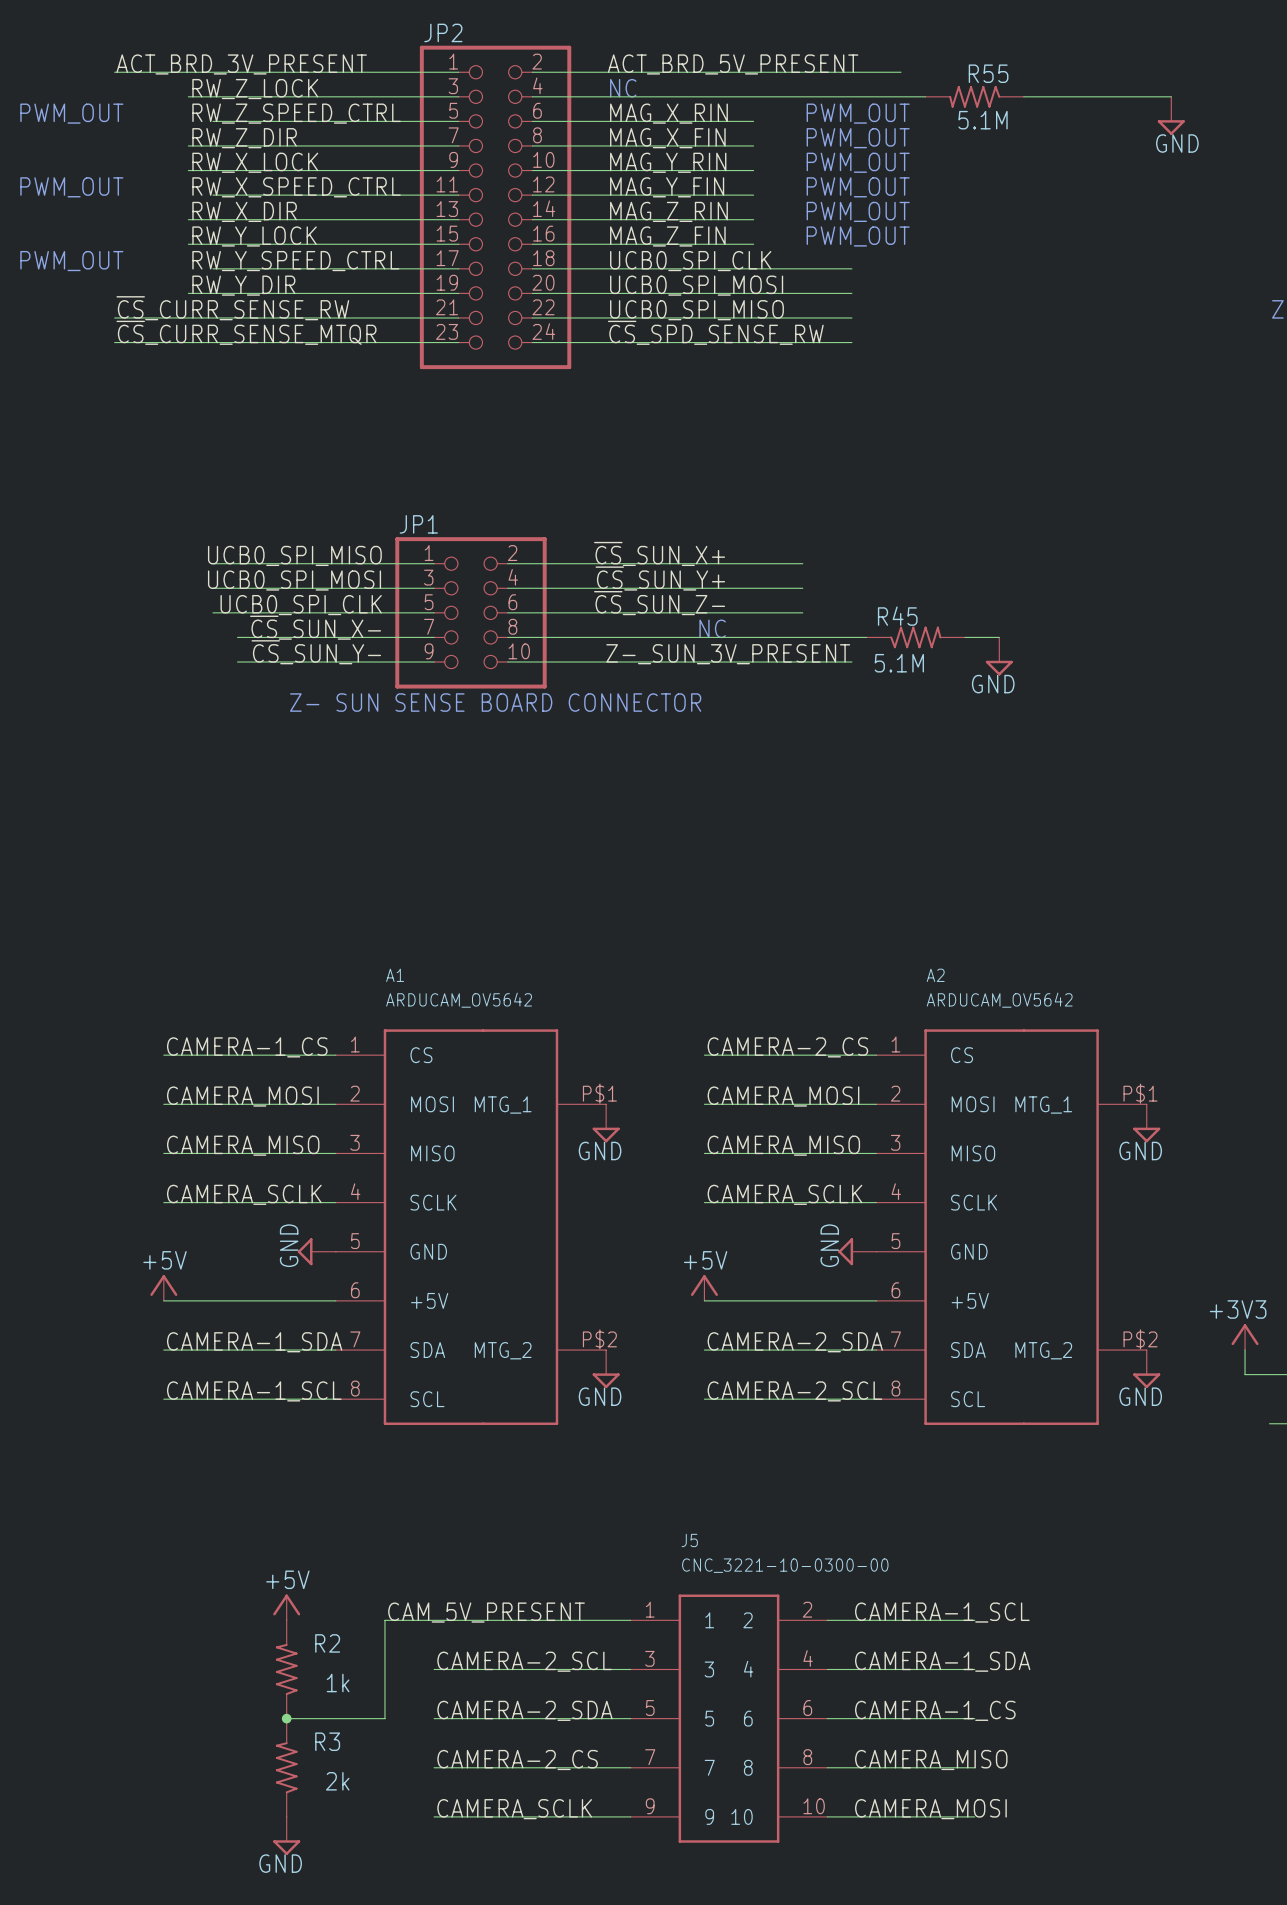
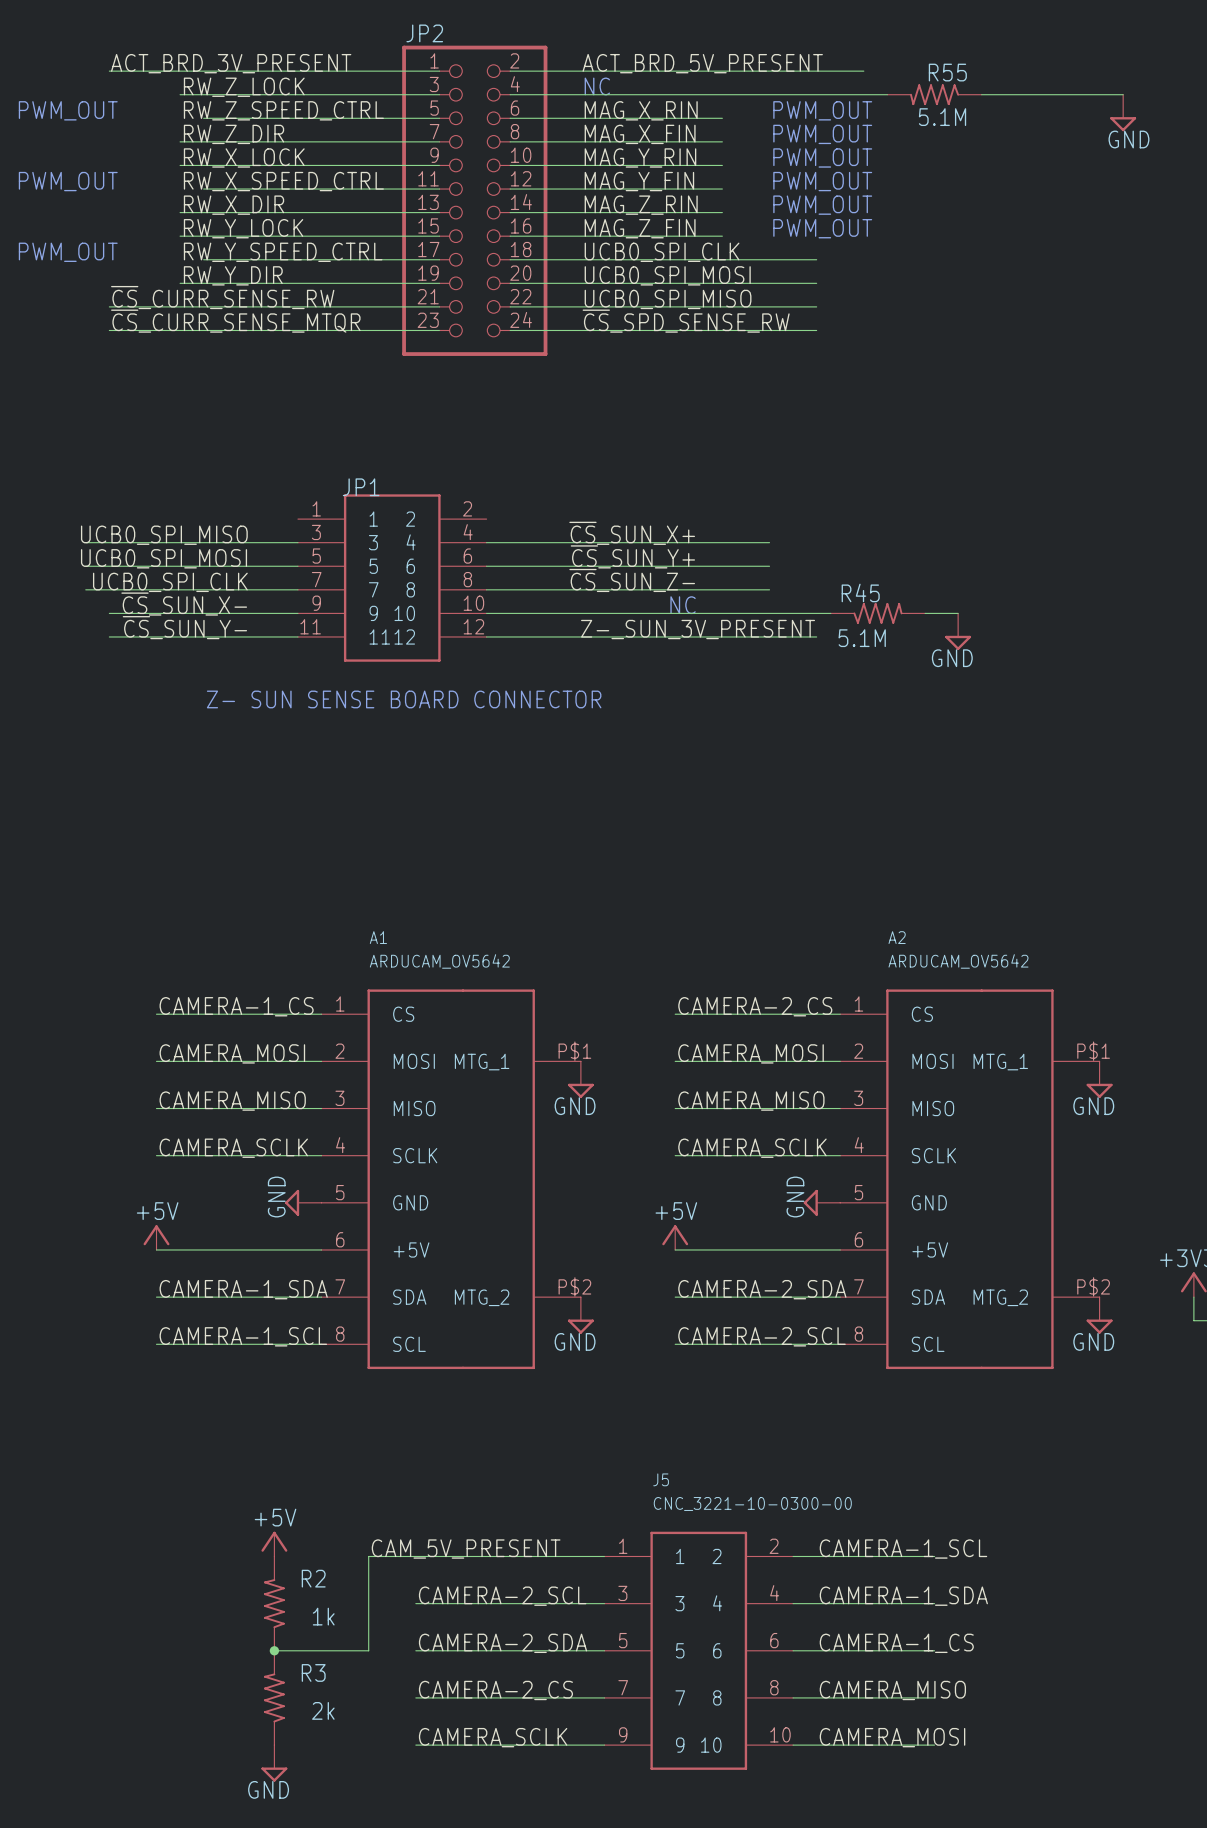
JP1 name position: JP1 (418, 524) -> JP1 (361, 487)
JP1 symbol: [395, 537, 547, 689] -> [297, 494, 487, 662]
label position: UCB0_SPI_MISO (294, 555) -> UCB0_SPI_MISO (164, 535)
wire: (311, 563) (434, 563) -> (85, 542) (203, 542)
label position: UCB0_SPI_MOSI (294, 580) -> UCB0_SPI_MOSI (164, 558)
wire: (311, 588) (434, 588) -> (85, 566) (203, 566)
label position: UCB0_SPI_CLK (301, 605) -> UCB0_SPI_CLK (170, 582)
wire: (311, 612) (434, 612) -> (85, 589) (203, 589)
label position: ~{CS}_SUN_X- (315, 627) -> ~{CS}_SUN_X- (184, 604)
wire: (311, 637) (434, 637) -> (109, 613) (227, 613)
label position: ~{CS}_SUN_Y- (316, 652) -> ~{CS}_SUN_Y- (184, 627)
wire: (311, 662) (434, 662) -> (109, 636) (227, 636)
text position: Z- SUN SENSE BOARD CONNECTOR (495, 702) -> Z- SUN SENSE BOARD CONNECTOR (404, 699)

